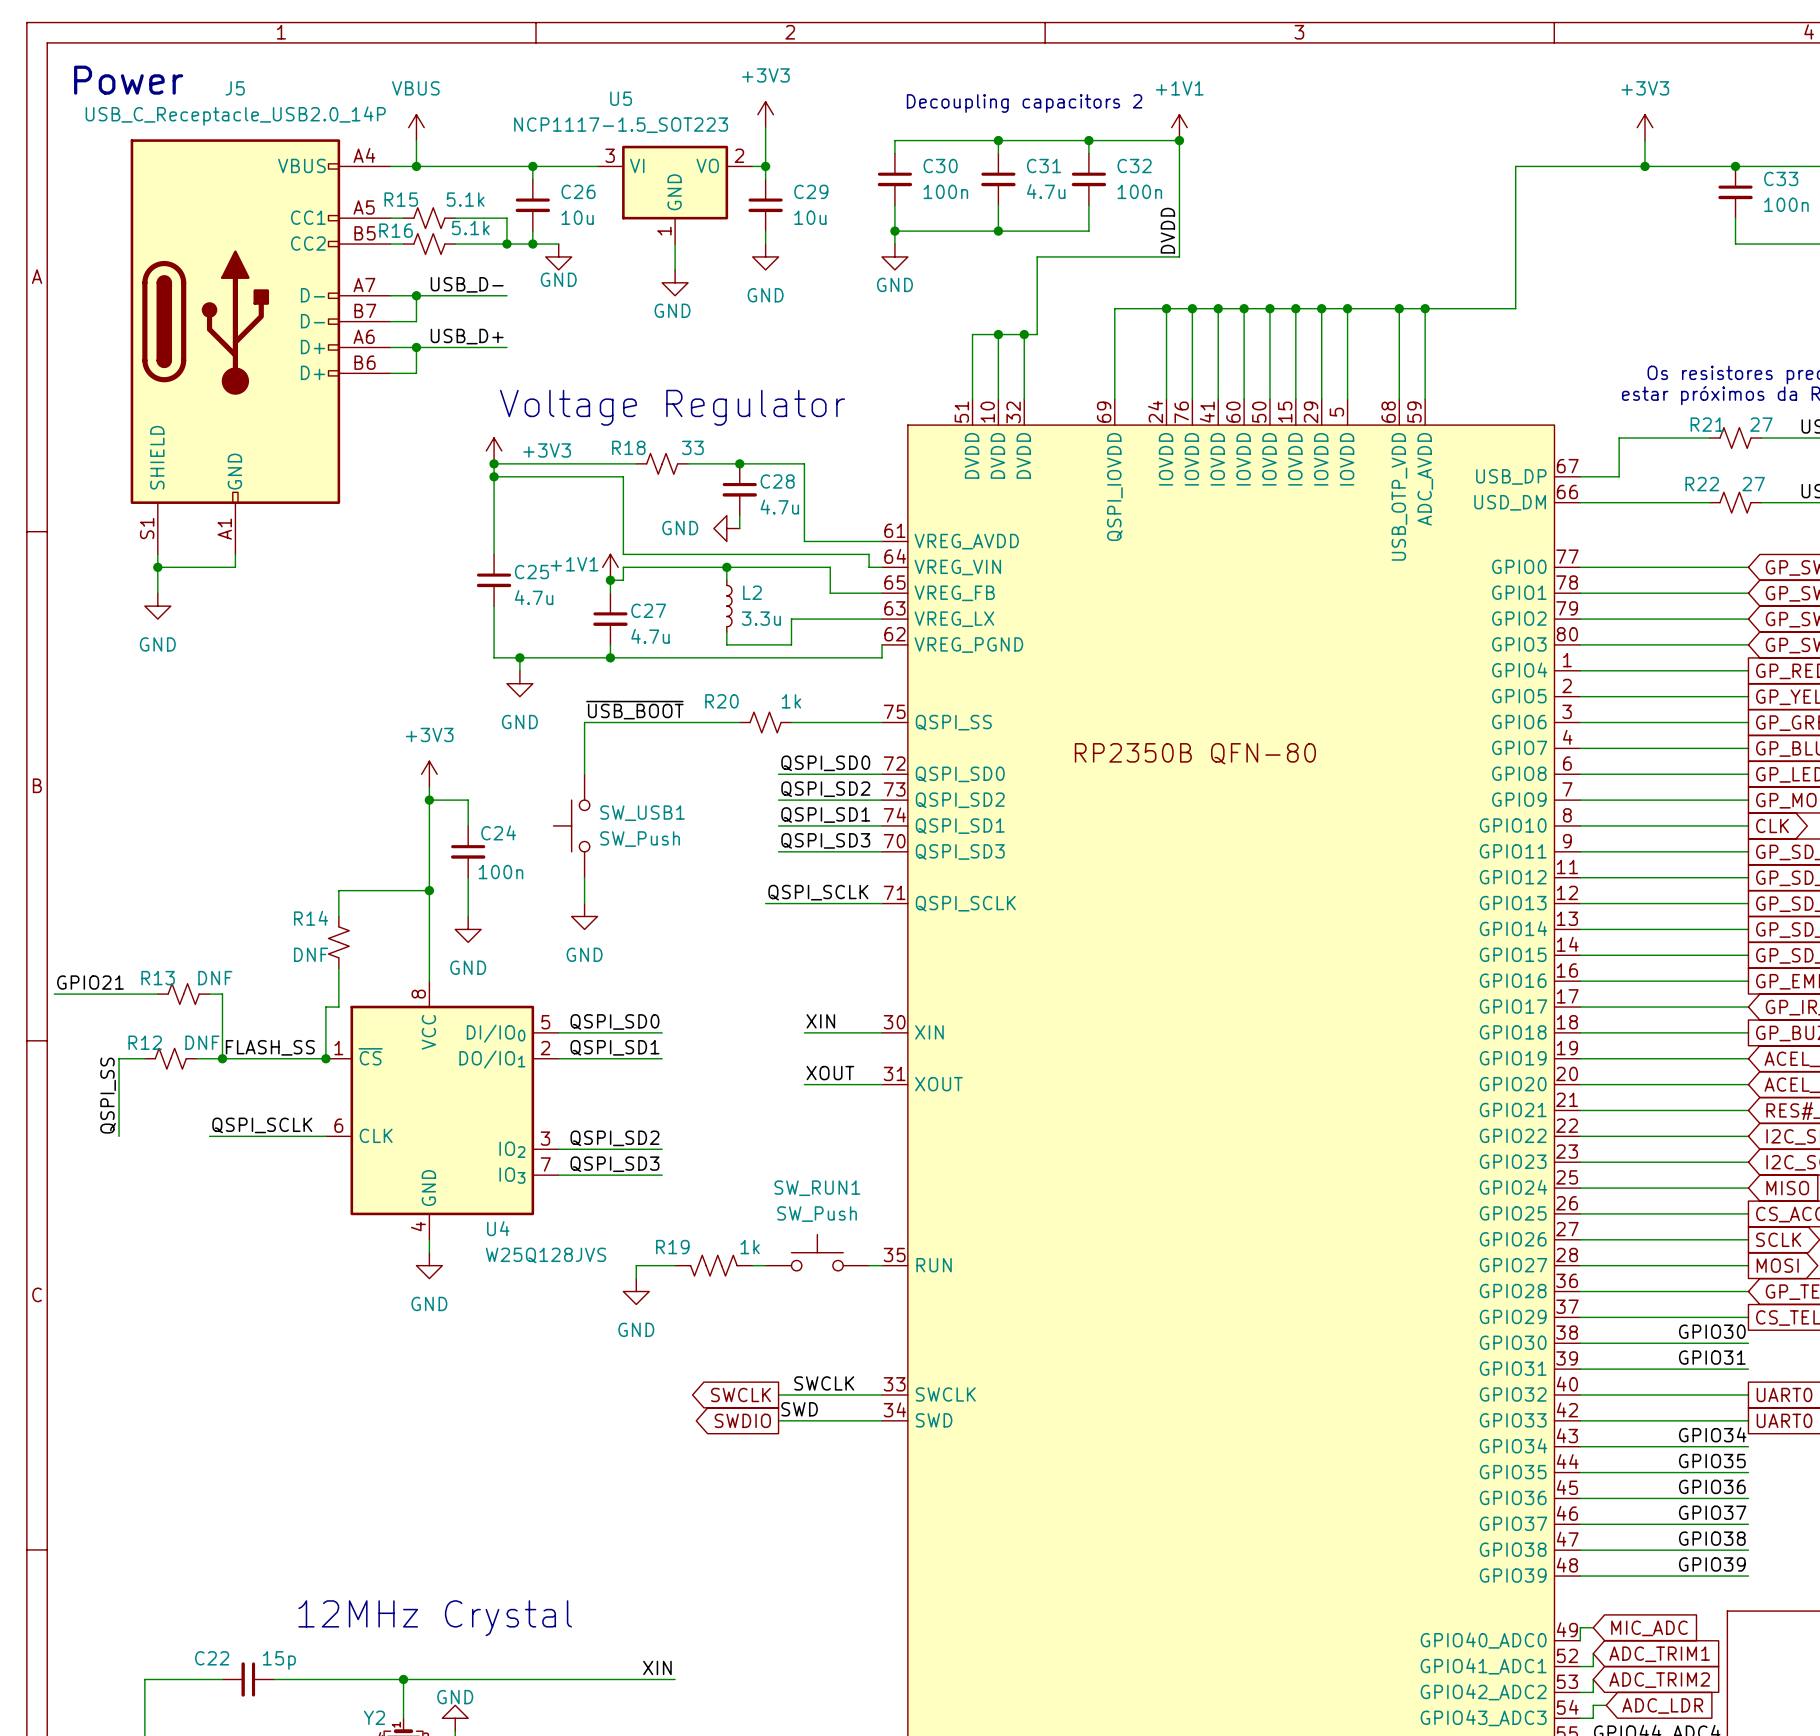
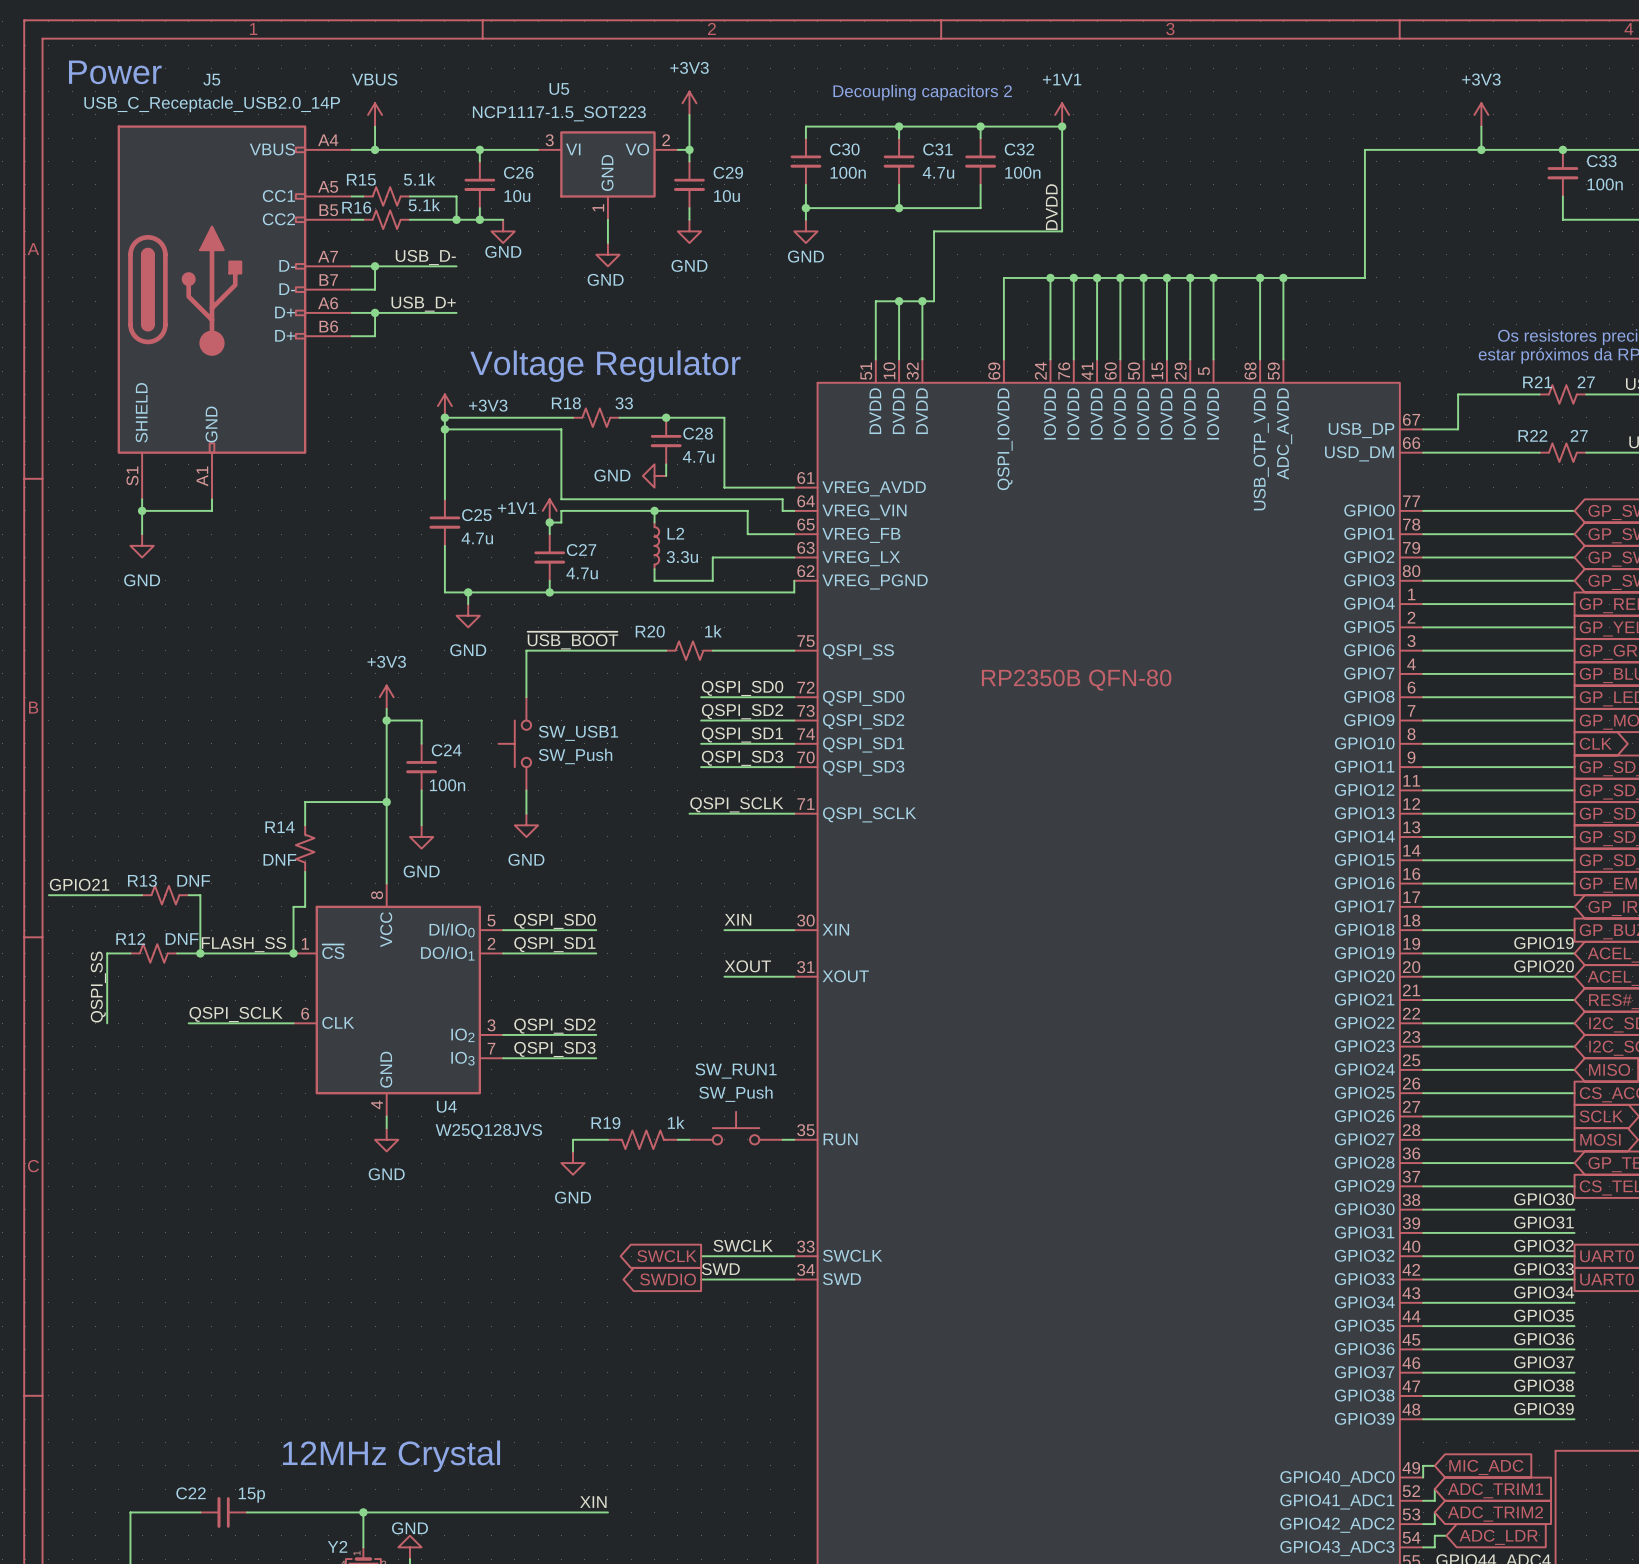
label: none -> GPIO19 (1544, 943)
label: none -> GPIO20 (1544, 966)
label: none -> GPIO32 (1543, 1245)
label: none -> GPIO33 (1544, 1269)

